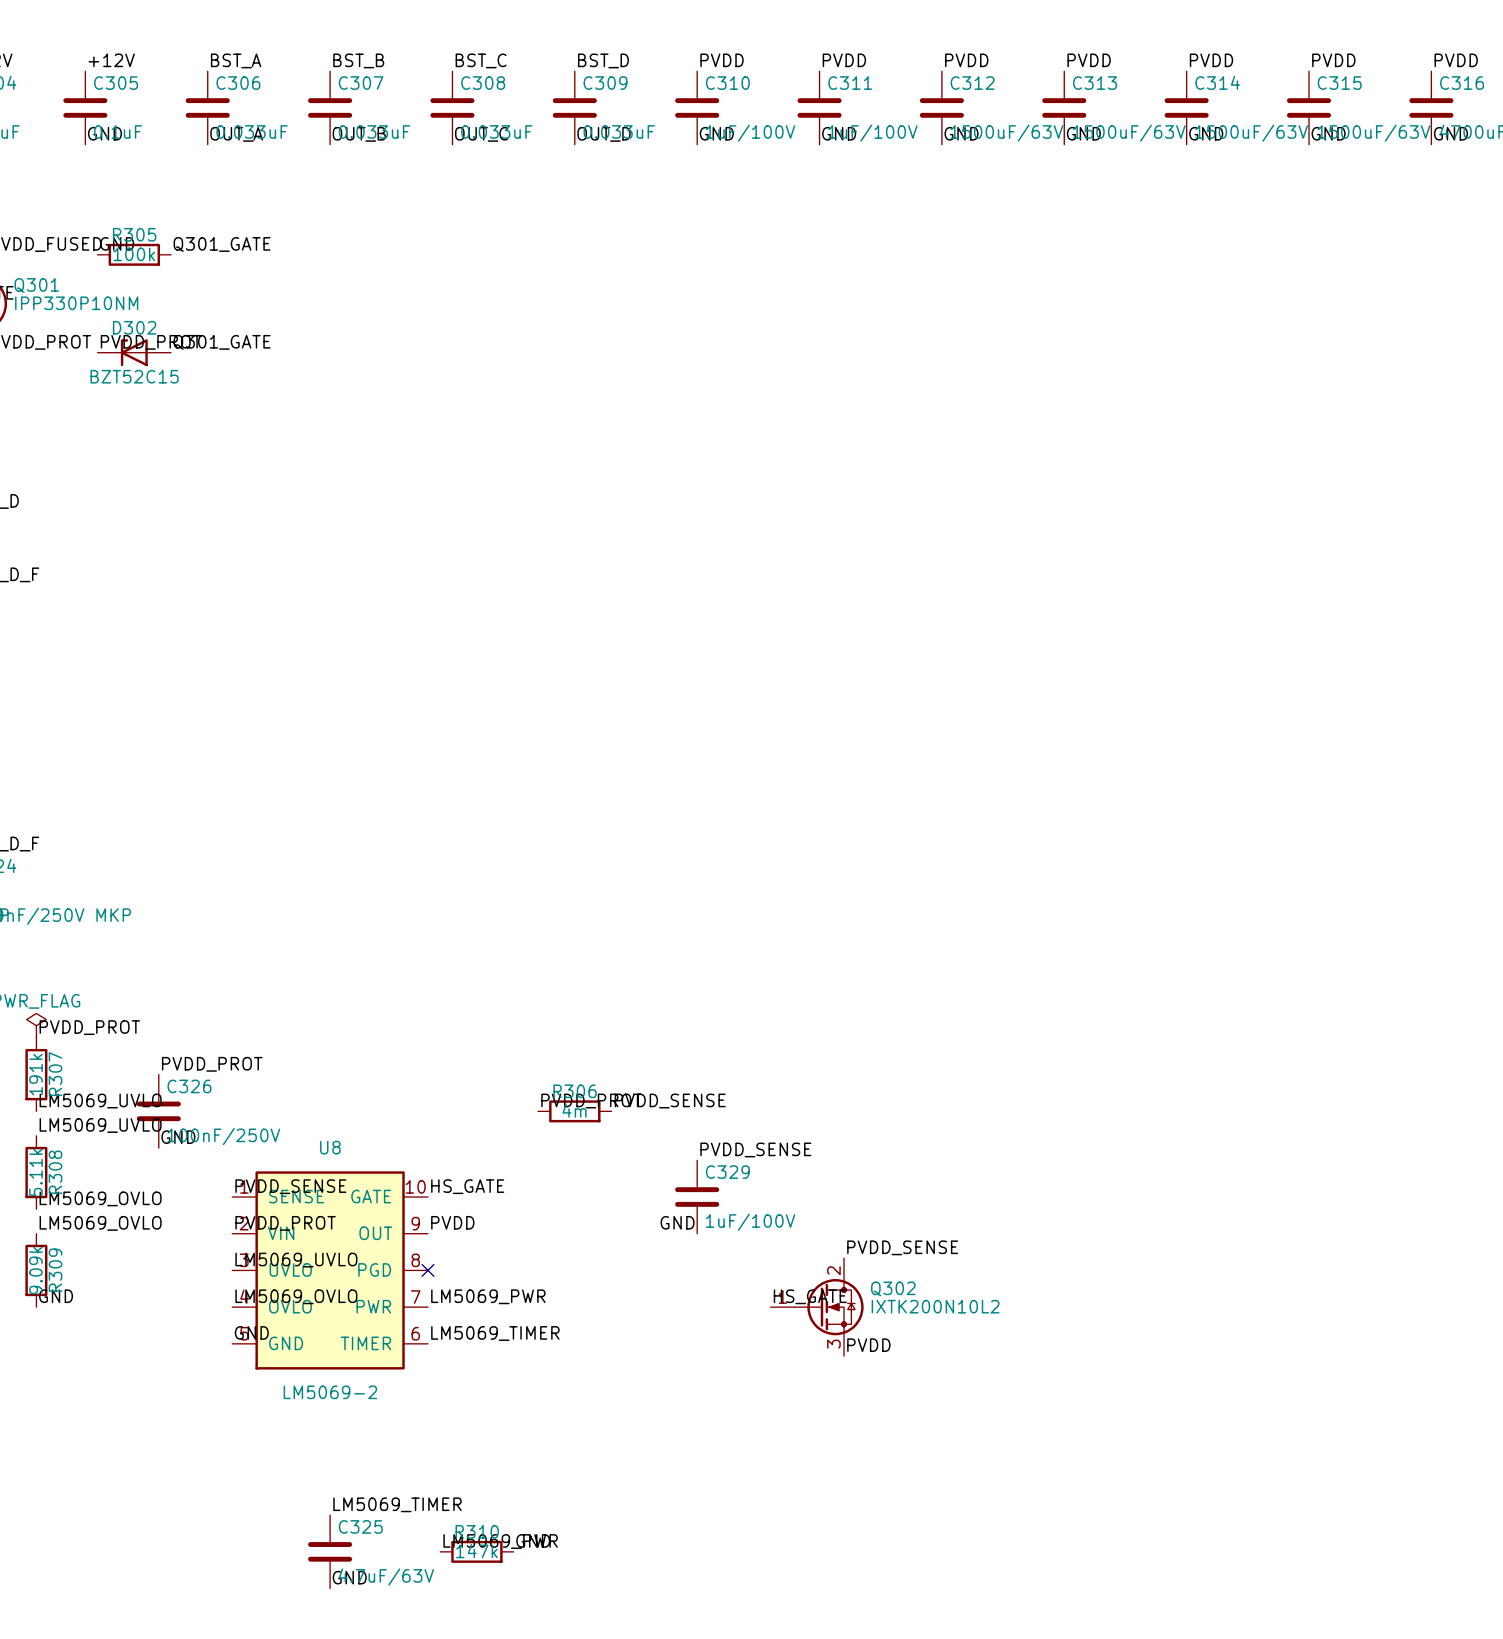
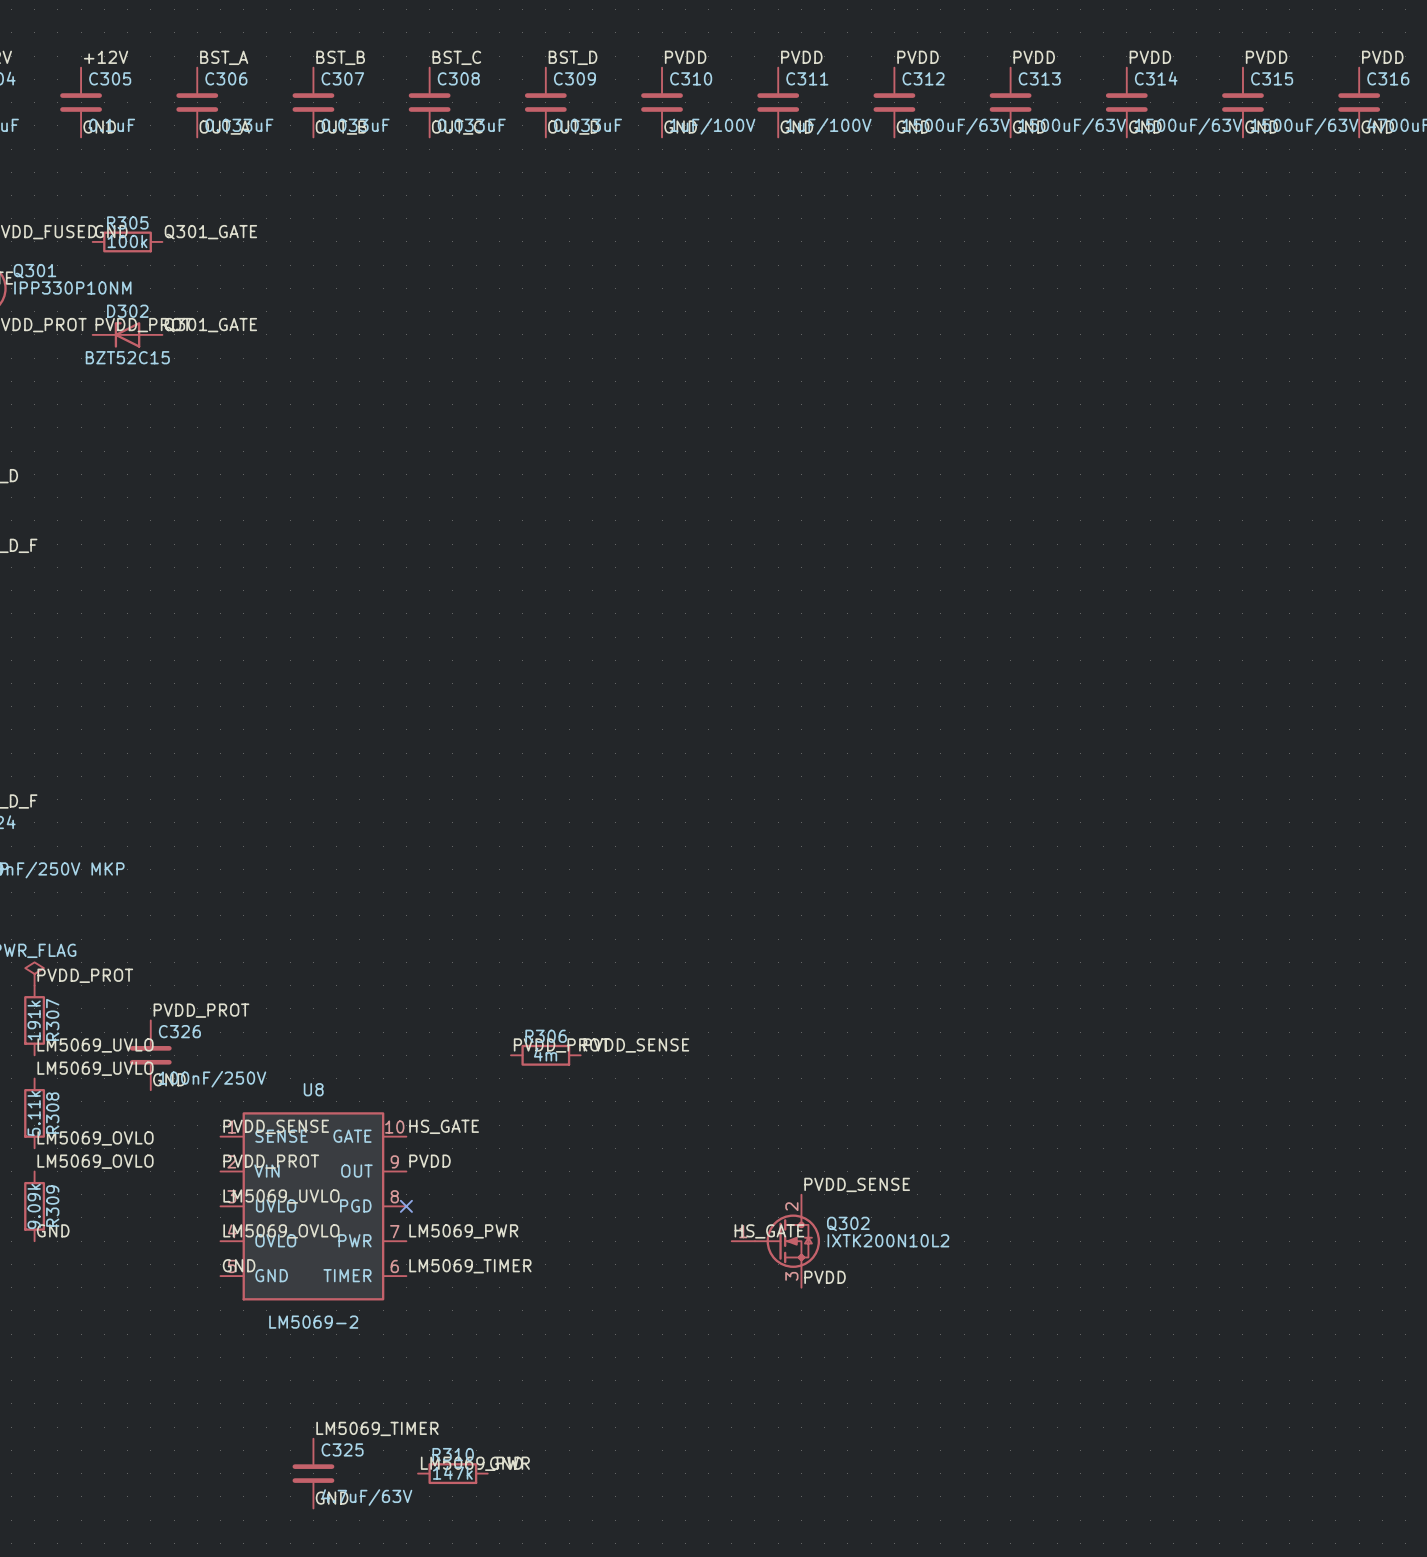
label: PVDD_SENSE (755, 1149) -> none
C329: 1uF/100V (697, 1197) -> none
label: GND (677, 1222) -> none

